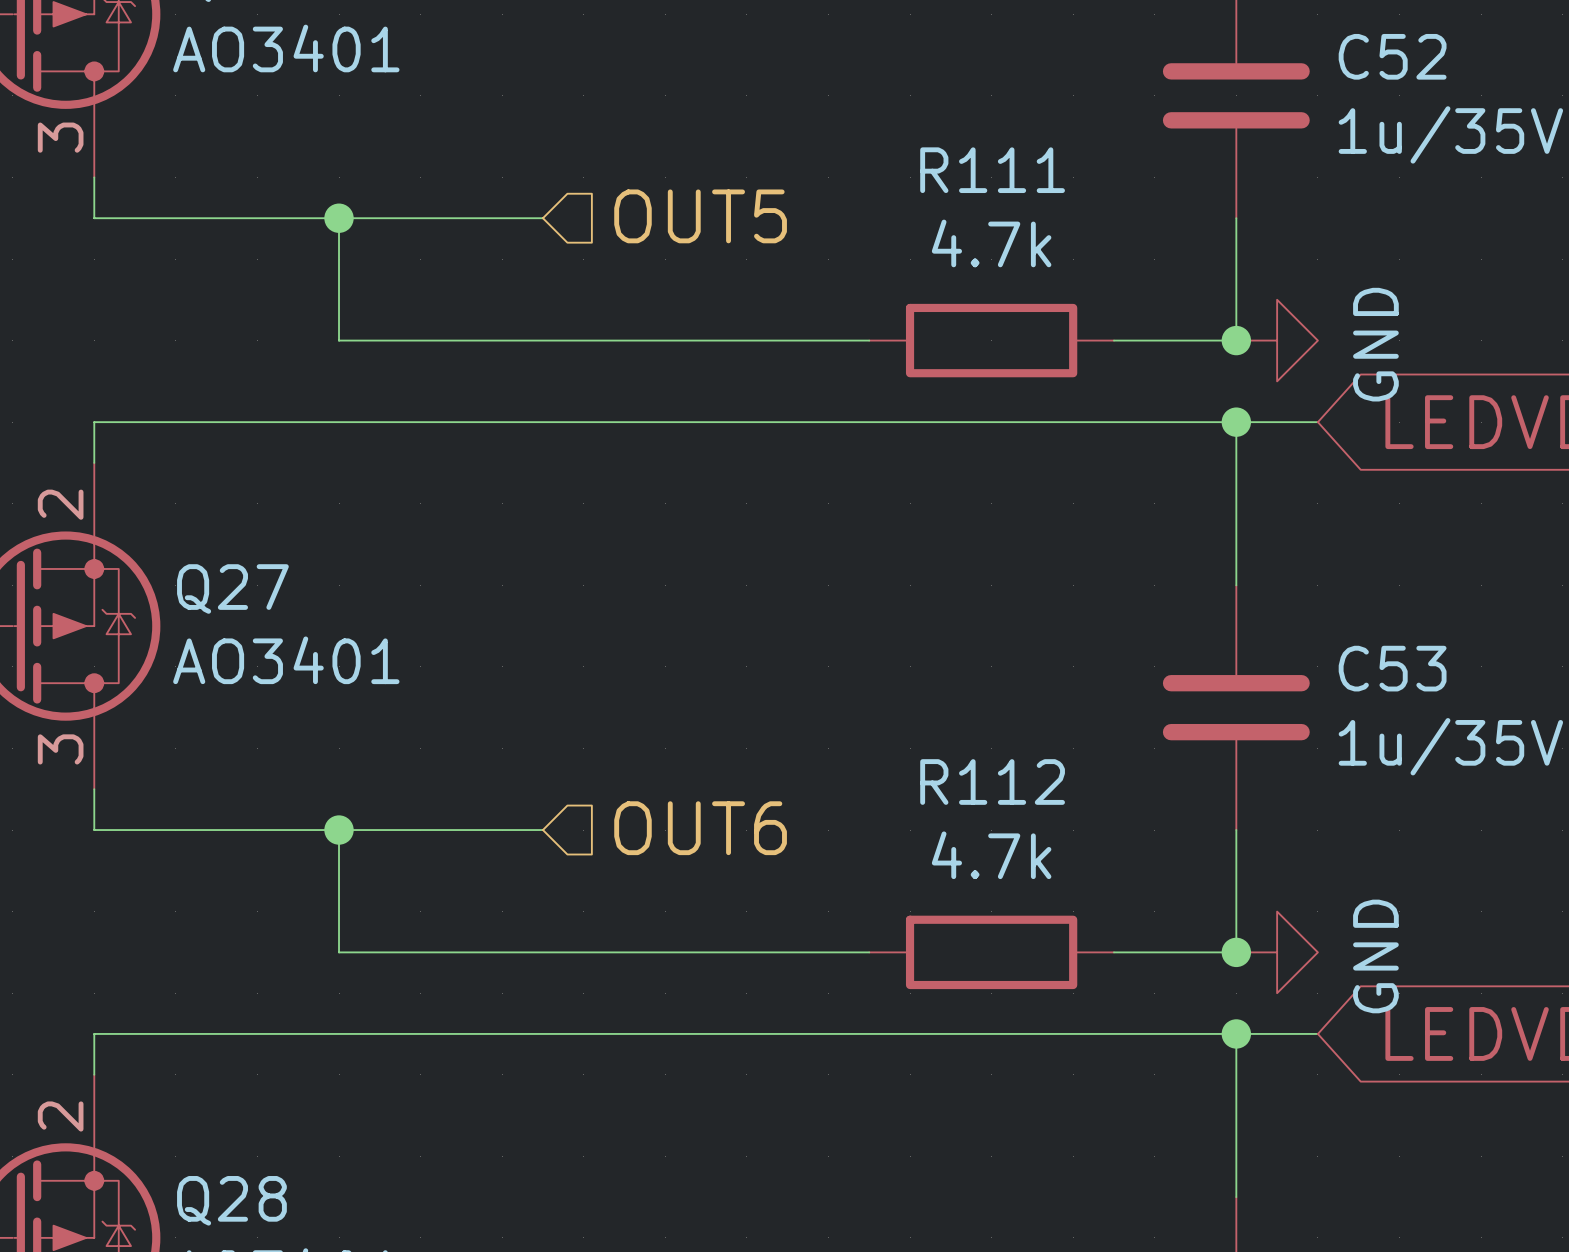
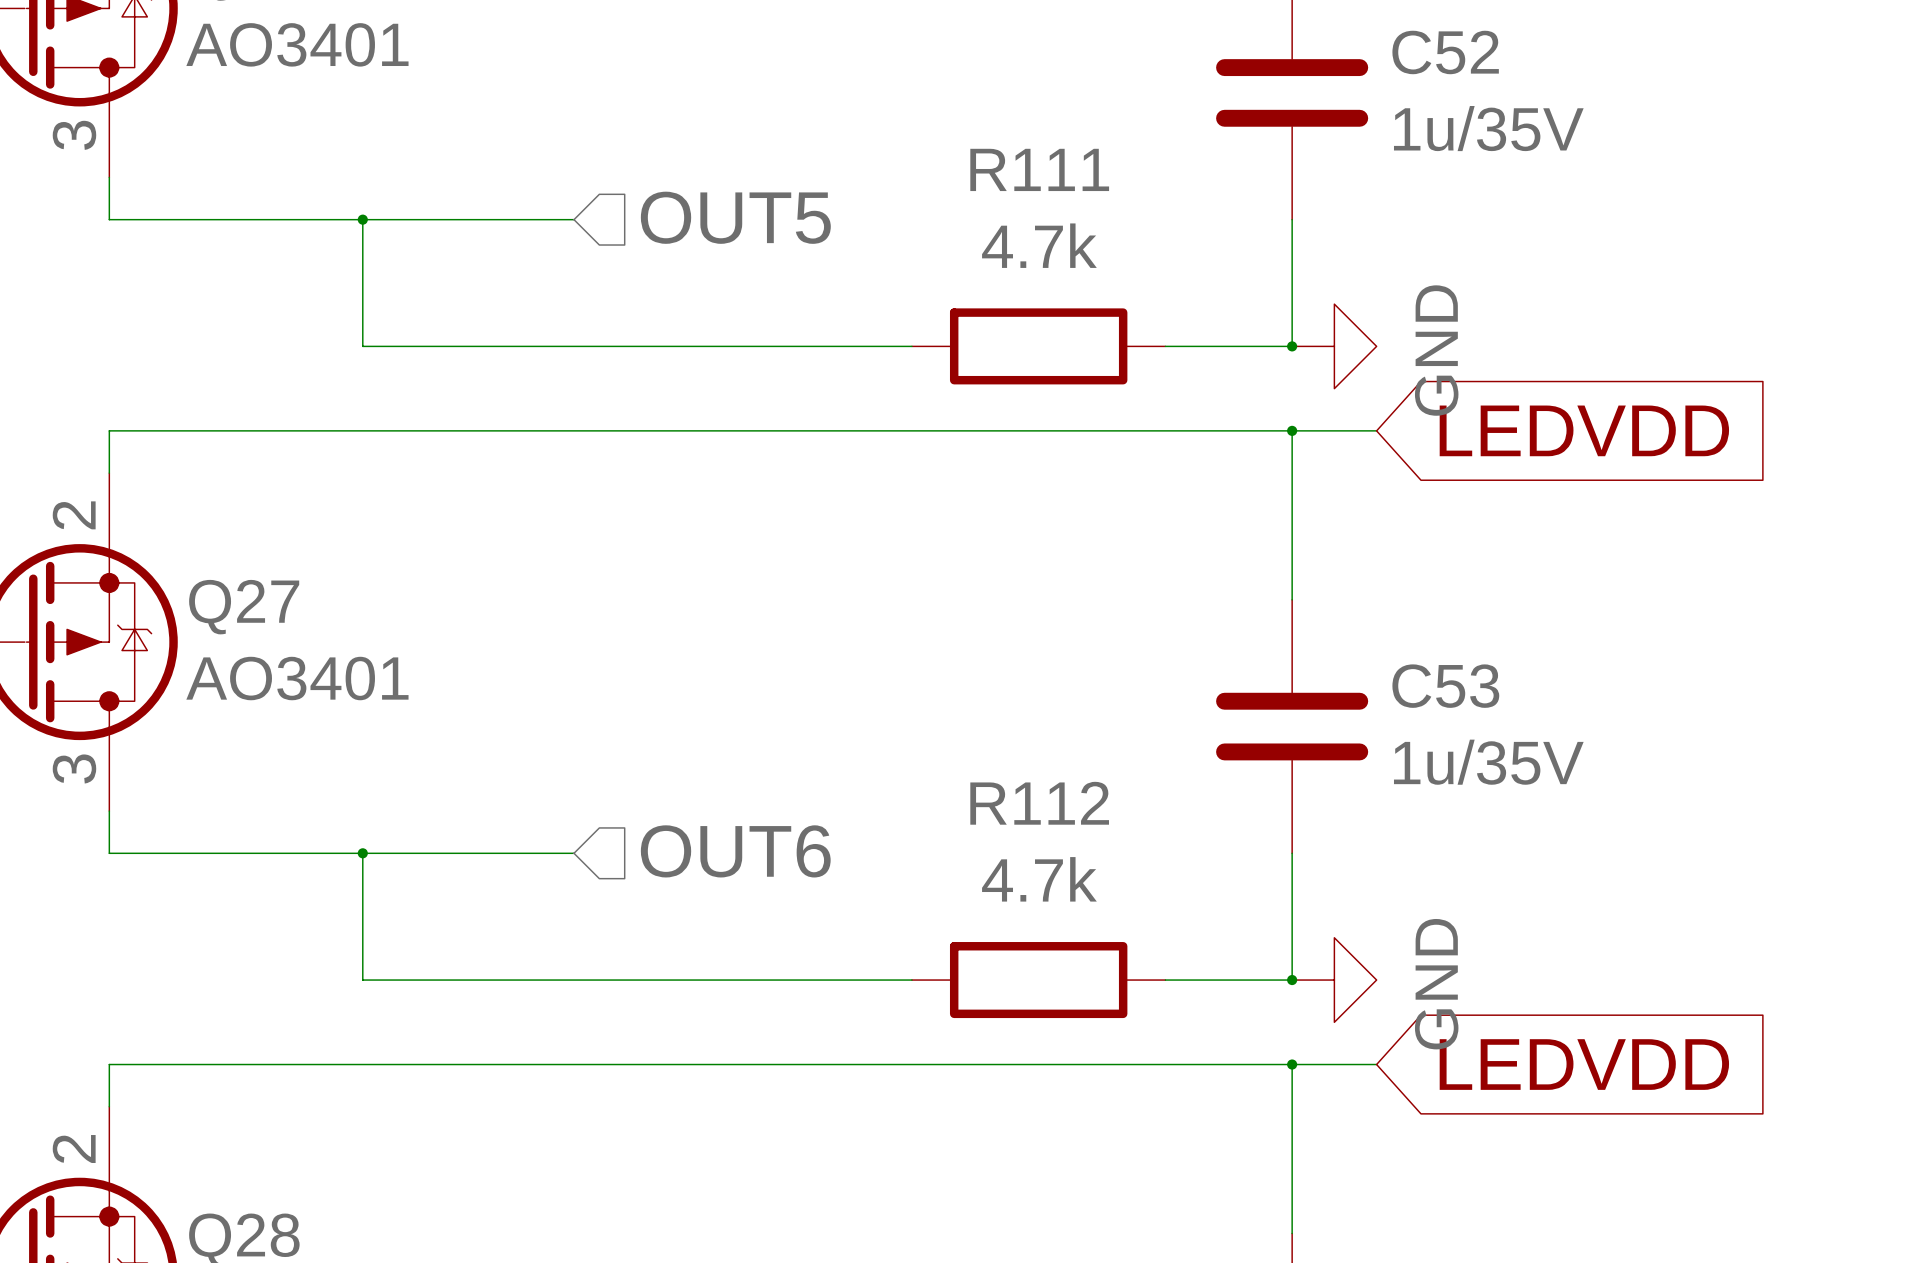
junction size: [324, 203, 354, 233] -> [357, 214, 368, 225]
junction size: [1221, 325, 1252, 356] -> [1287, 341, 1298, 352]
junction size: [1221, 407, 1252, 437] -> [1287, 425, 1298, 436]
junction size: [324, 815, 354, 845] -> [357, 848, 368, 859]
junction size: [1221, 937, 1252, 968] -> [1287, 974, 1298, 986]
junction size: [1221, 1019, 1252, 1049] -> [1287, 1059, 1298, 1070]

